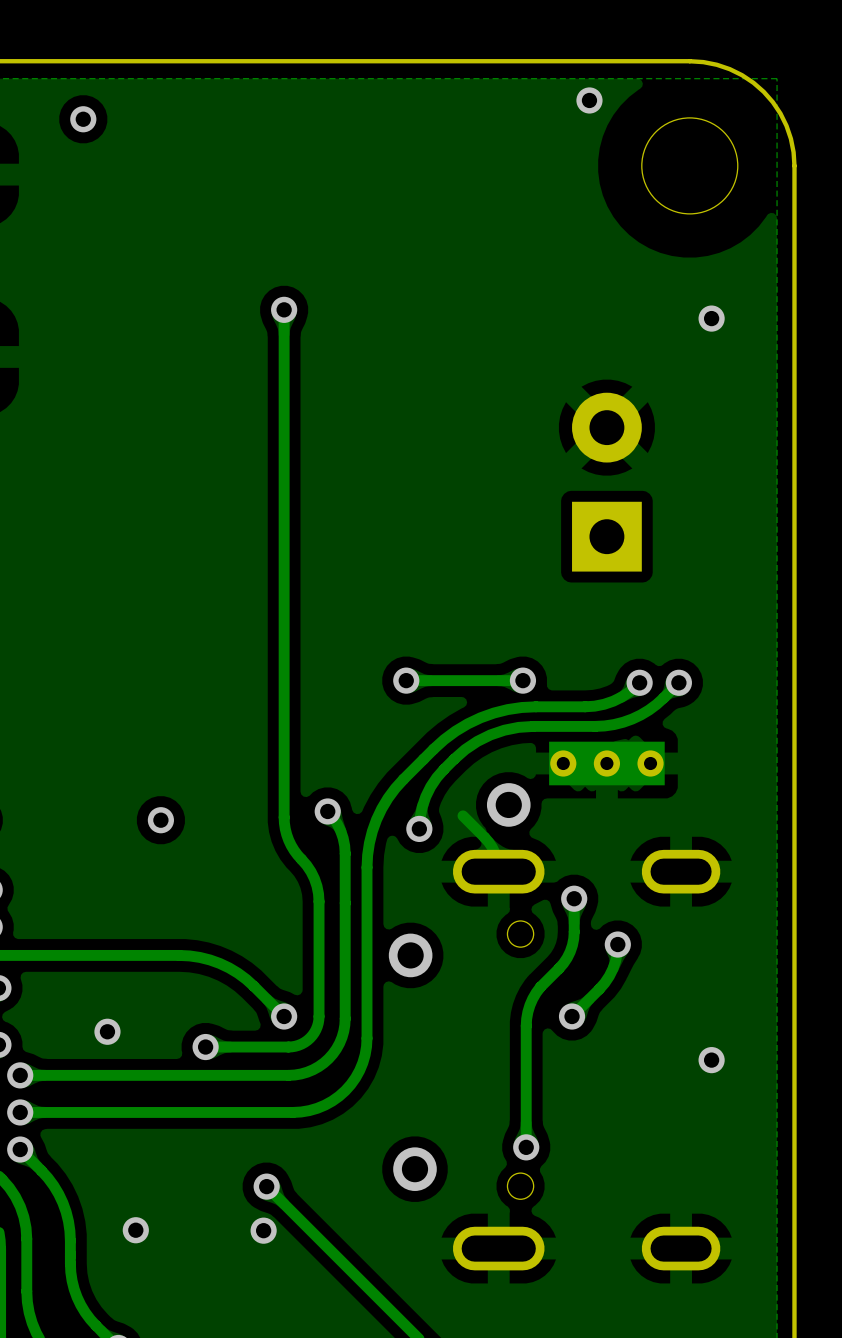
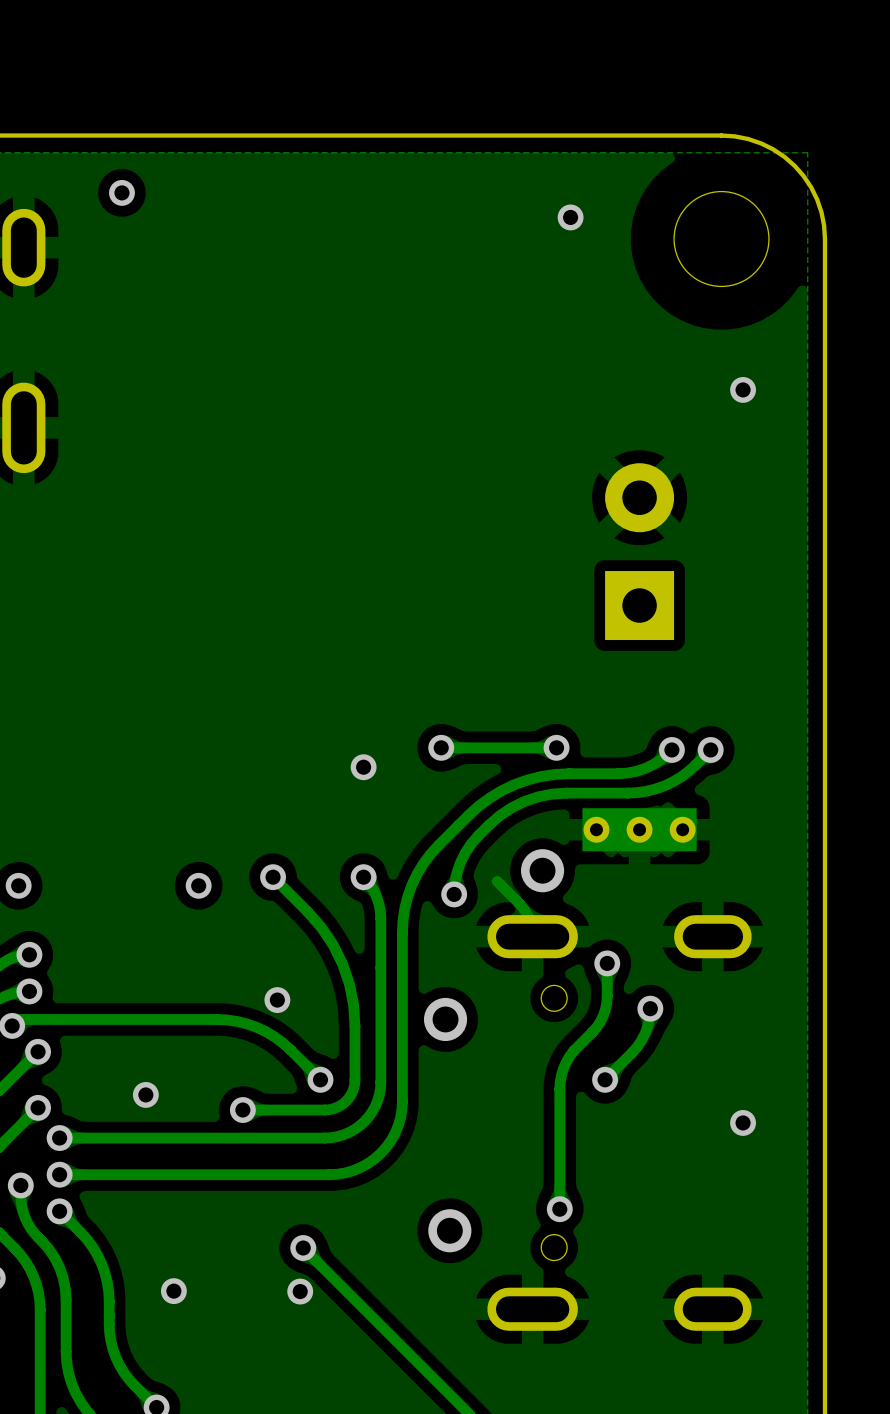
via position: (589, 100) -> (570, 217)
track: (284, 309) (284, 823) (291, 845) (311, 871) (317, 886) (319, 901) (319, 962) -> (273, 877) (307, 911) (333, 945) (349, 984) (354, 1026)
via: (284, 309) -> none
via: none -> (363, 767)
via: none -> (273, 877)
via: none -> (277, 1000)

